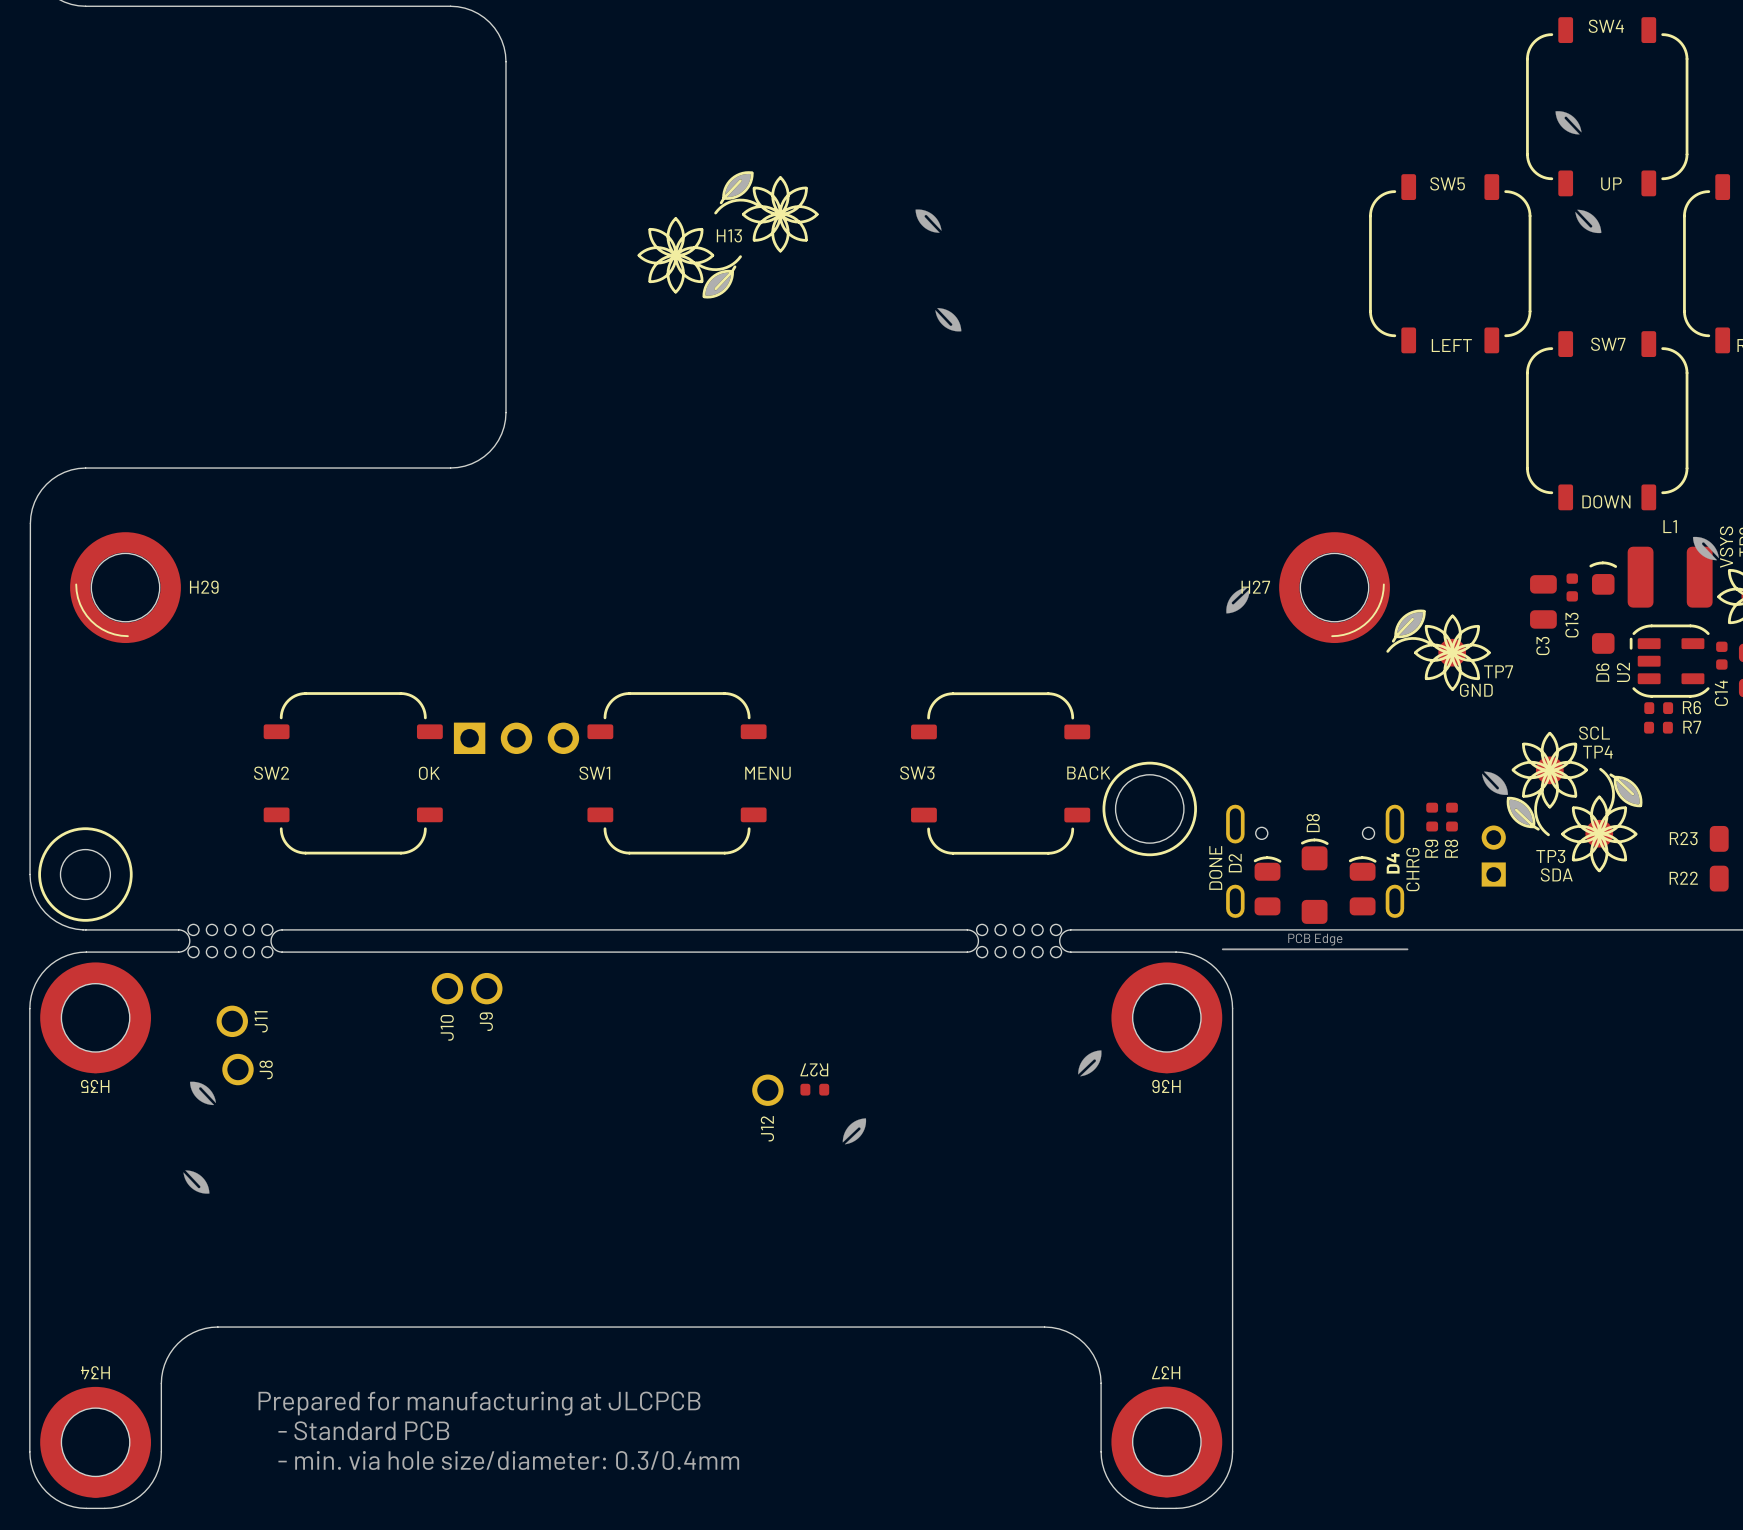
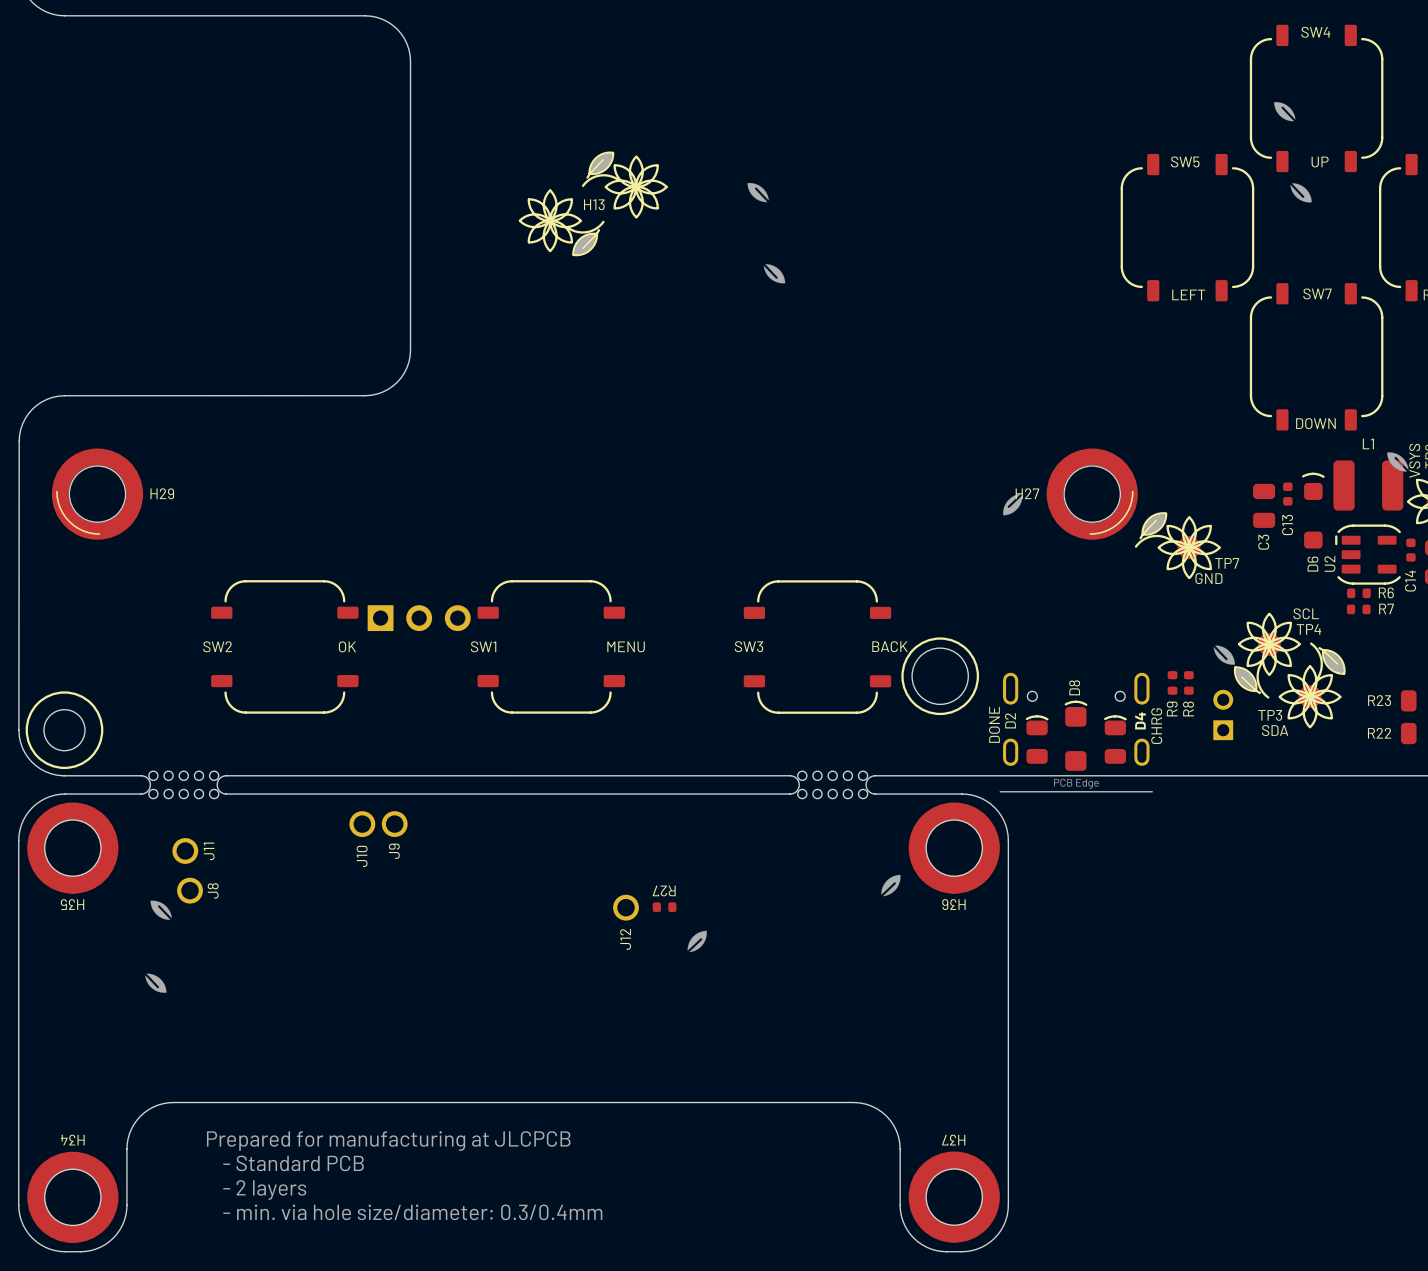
text: none -> Prepared for manufacturing at JLCPCB (388, 1141)
text: Prepared for manufacturing at JLCPCB (479, 1403) -> - Standard PCB (293, 1163)
text: - Standard PCB (363, 1430) -> - 2 layers (264, 1189)

